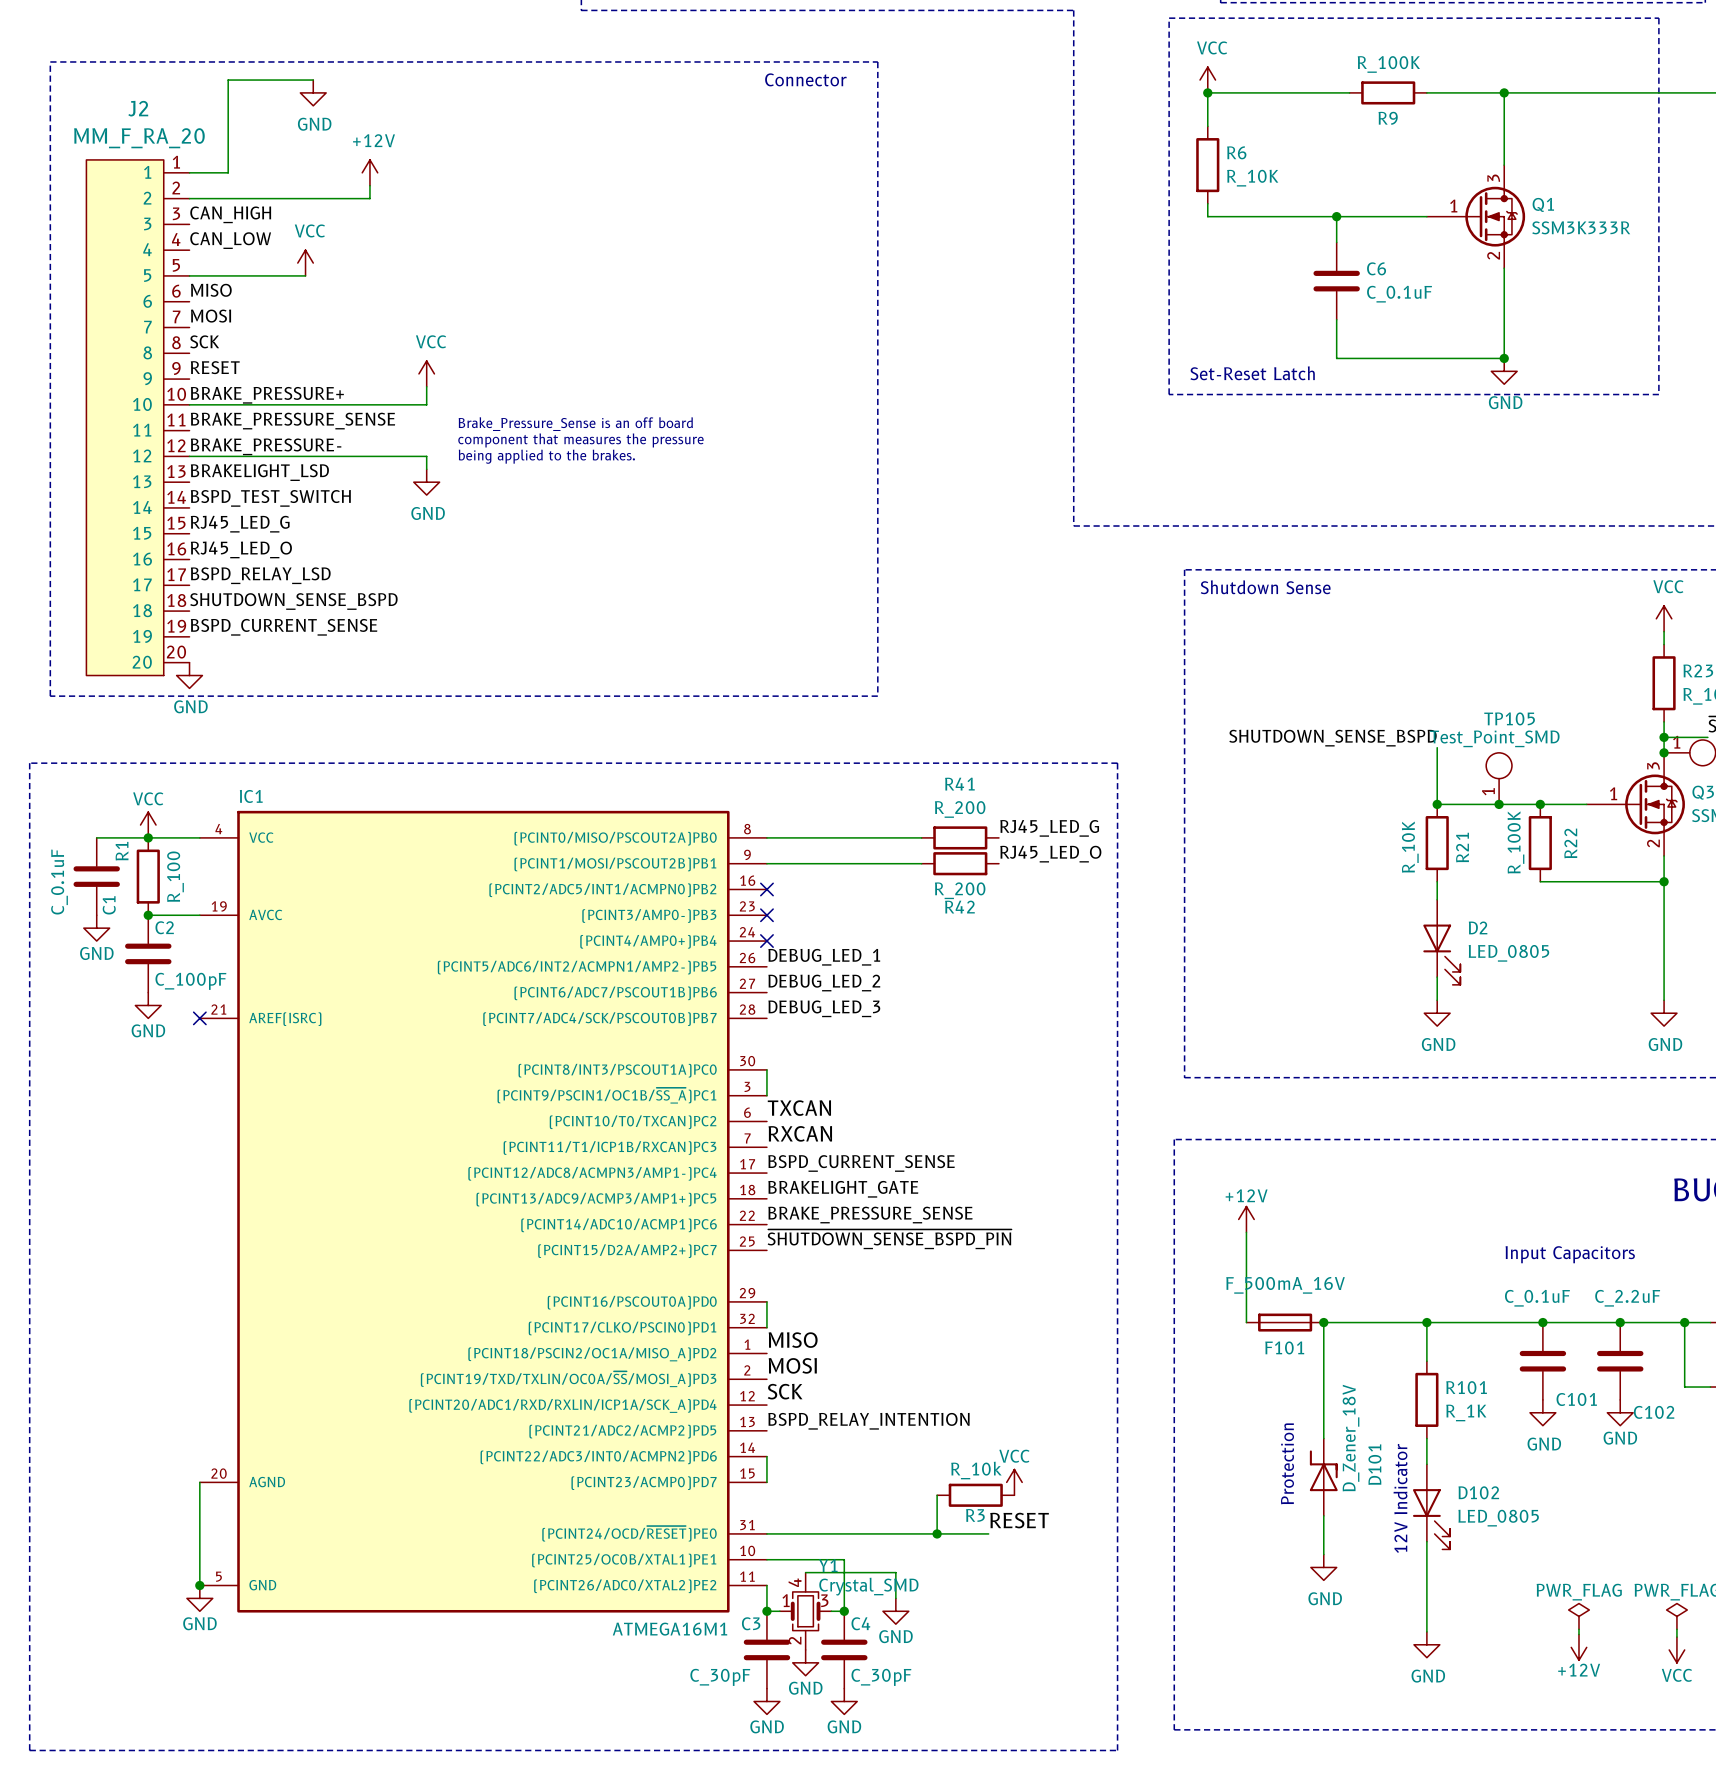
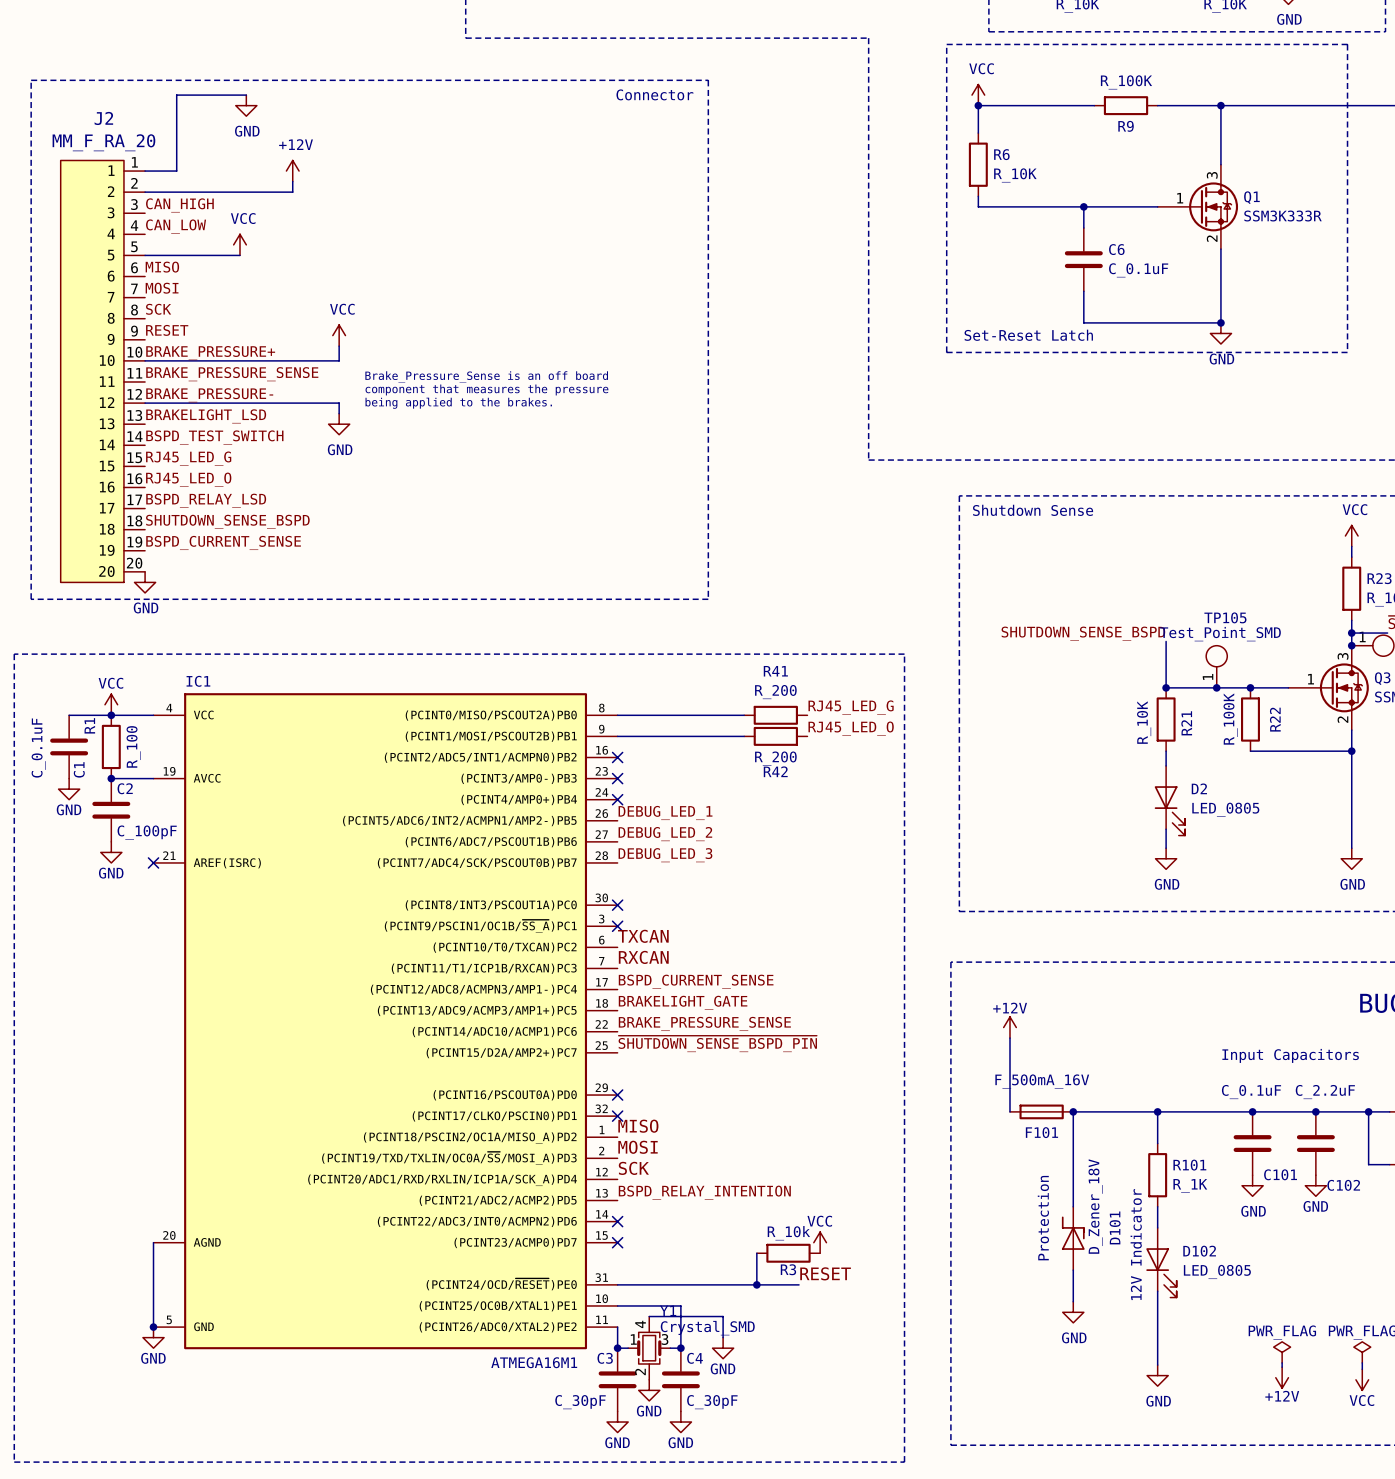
wire: (766, 1069) (766, 1095) -> none
no-connect mark: none -> (617, 905)
no-connect mark: none -> (617, 926)
wire: (766, 1301) (766, 1327) -> none
no-connect mark: none -> (617, 1095)
no-connect mark: none -> (617, 1116)
wire: (766, 1456) (766, 1482) -> none
no-connect mark: none -> (617, 1221)
no-connect mark: none -> (617, 1242)

